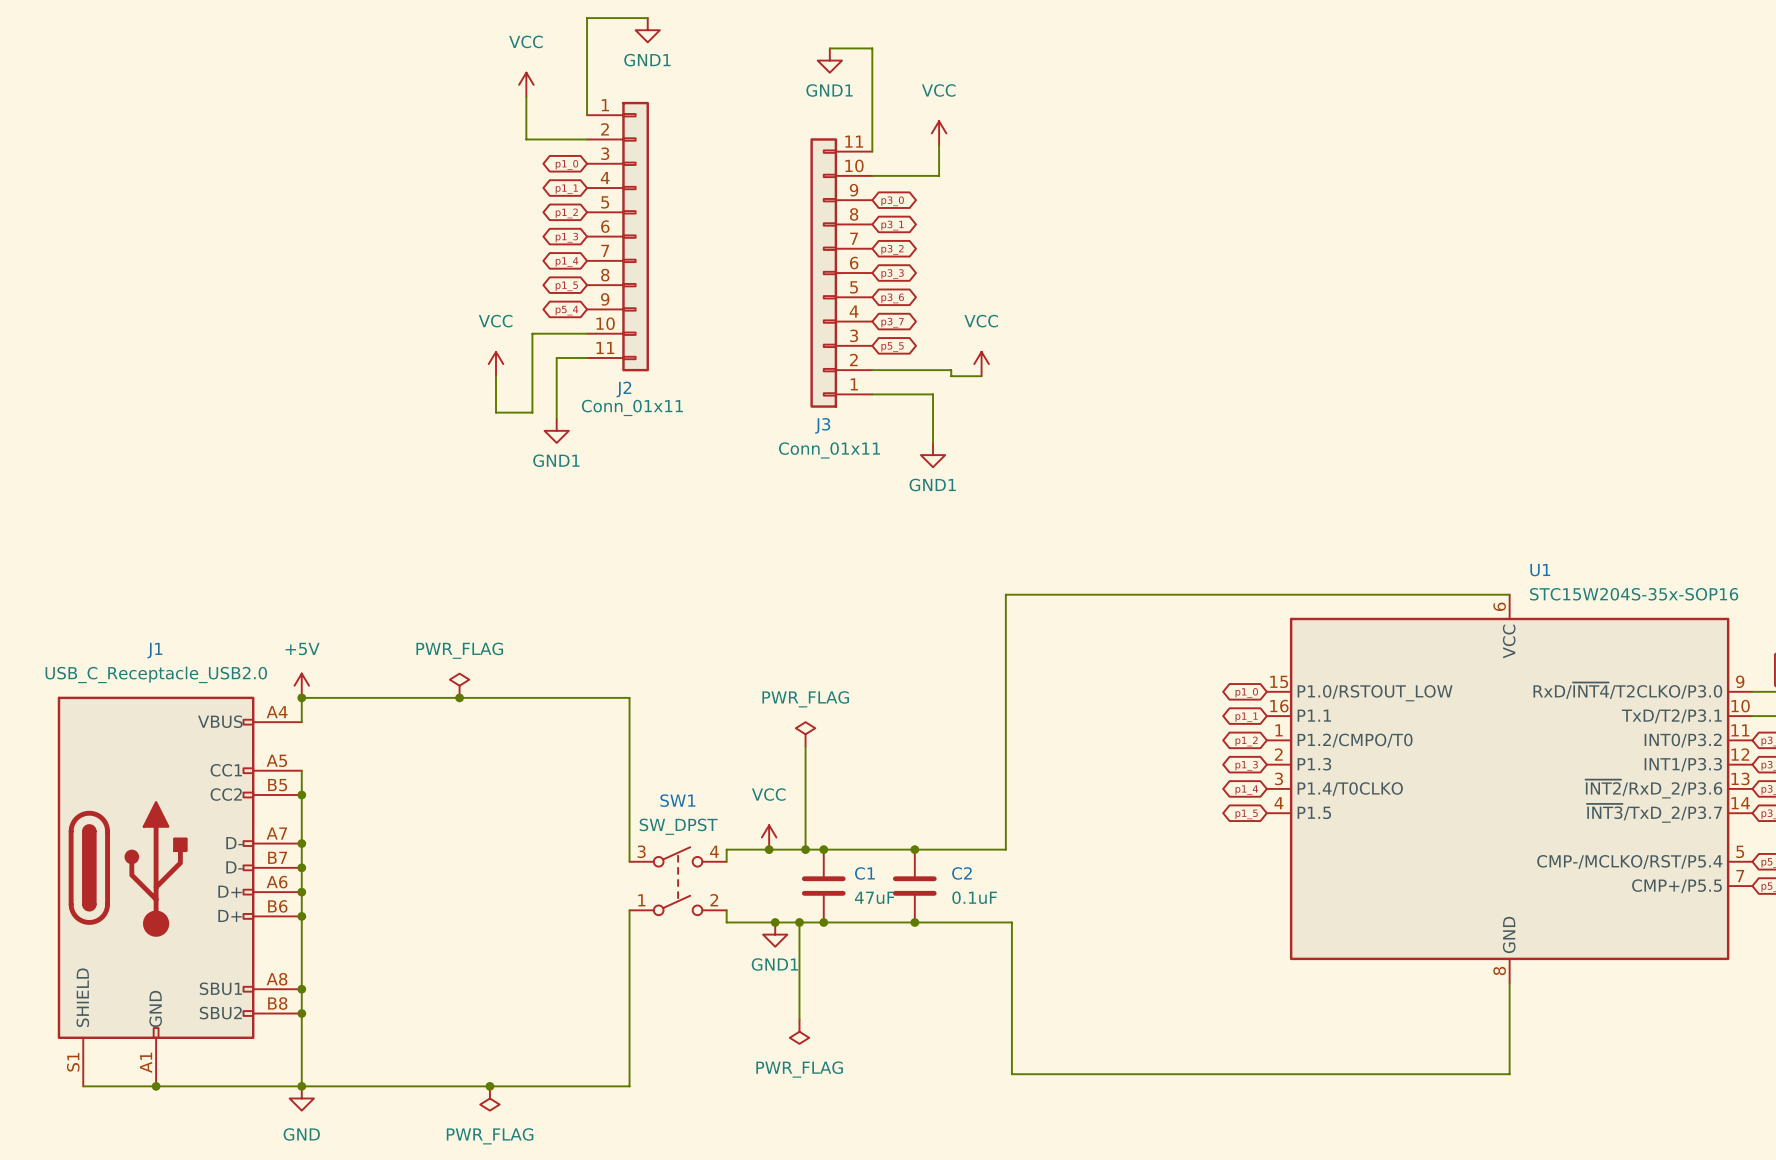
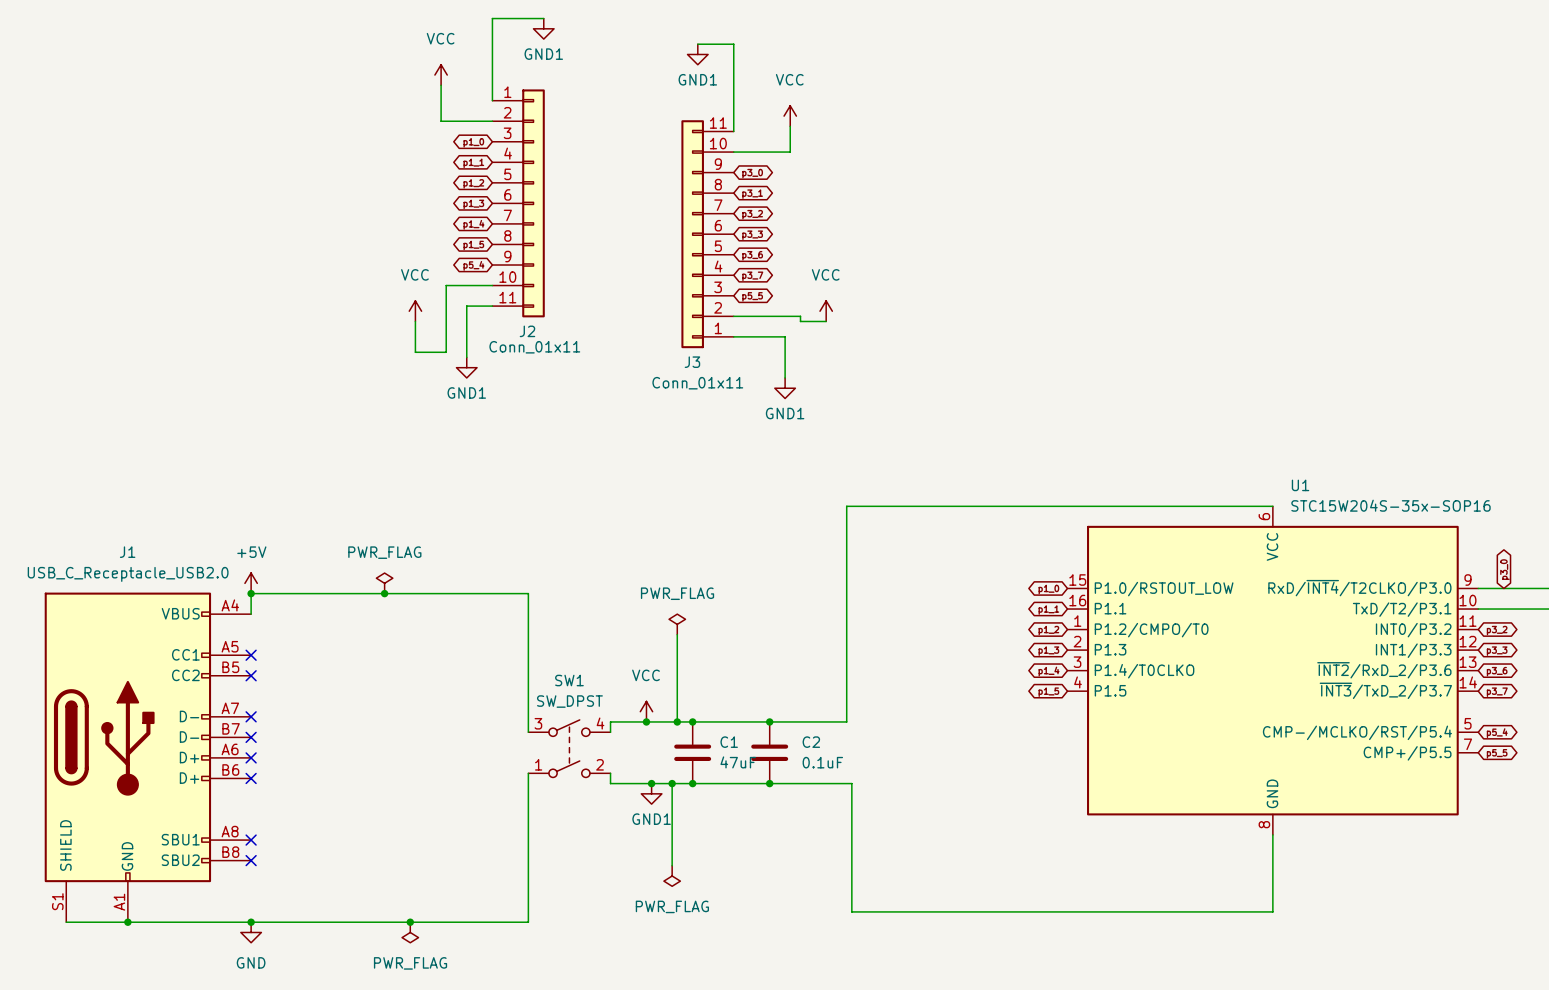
wire: (301, 770) (301, 1086) -> none
no-connect mark: none -> (251, 655)
junction: (301, 795) -> none
no-connect mark: none -> (251, 675)
junction: (301, 843) -> none
no-connect mark: none -> (251, 716)
junction: (301, 867) -> none
no-connect mark: none -> (251, 737)
junction: (301, 892) -> none
no-connect mark: none -> (251, 757)
junction: (301, 916) -> none
no-connect mark: none -> (251, 778)
junction: (301, 989) -> none
no-connect mark: none -> (251, 840)
junction: (301, 1013) -> none
no-connect mark: none -> (251, 860)

